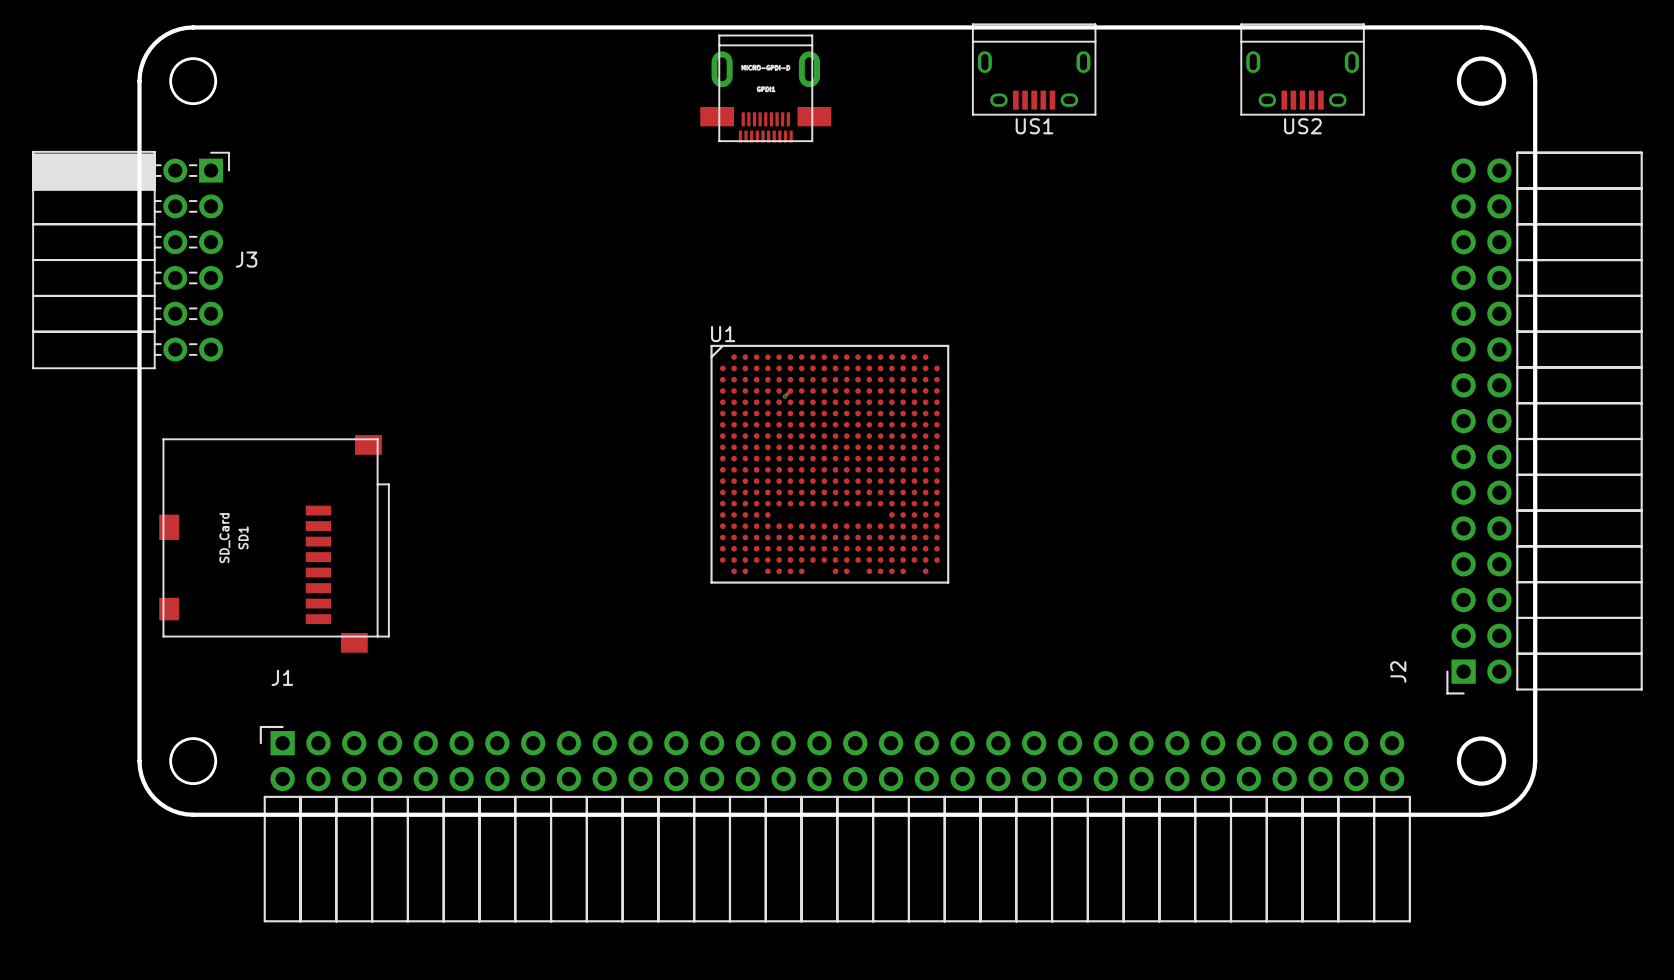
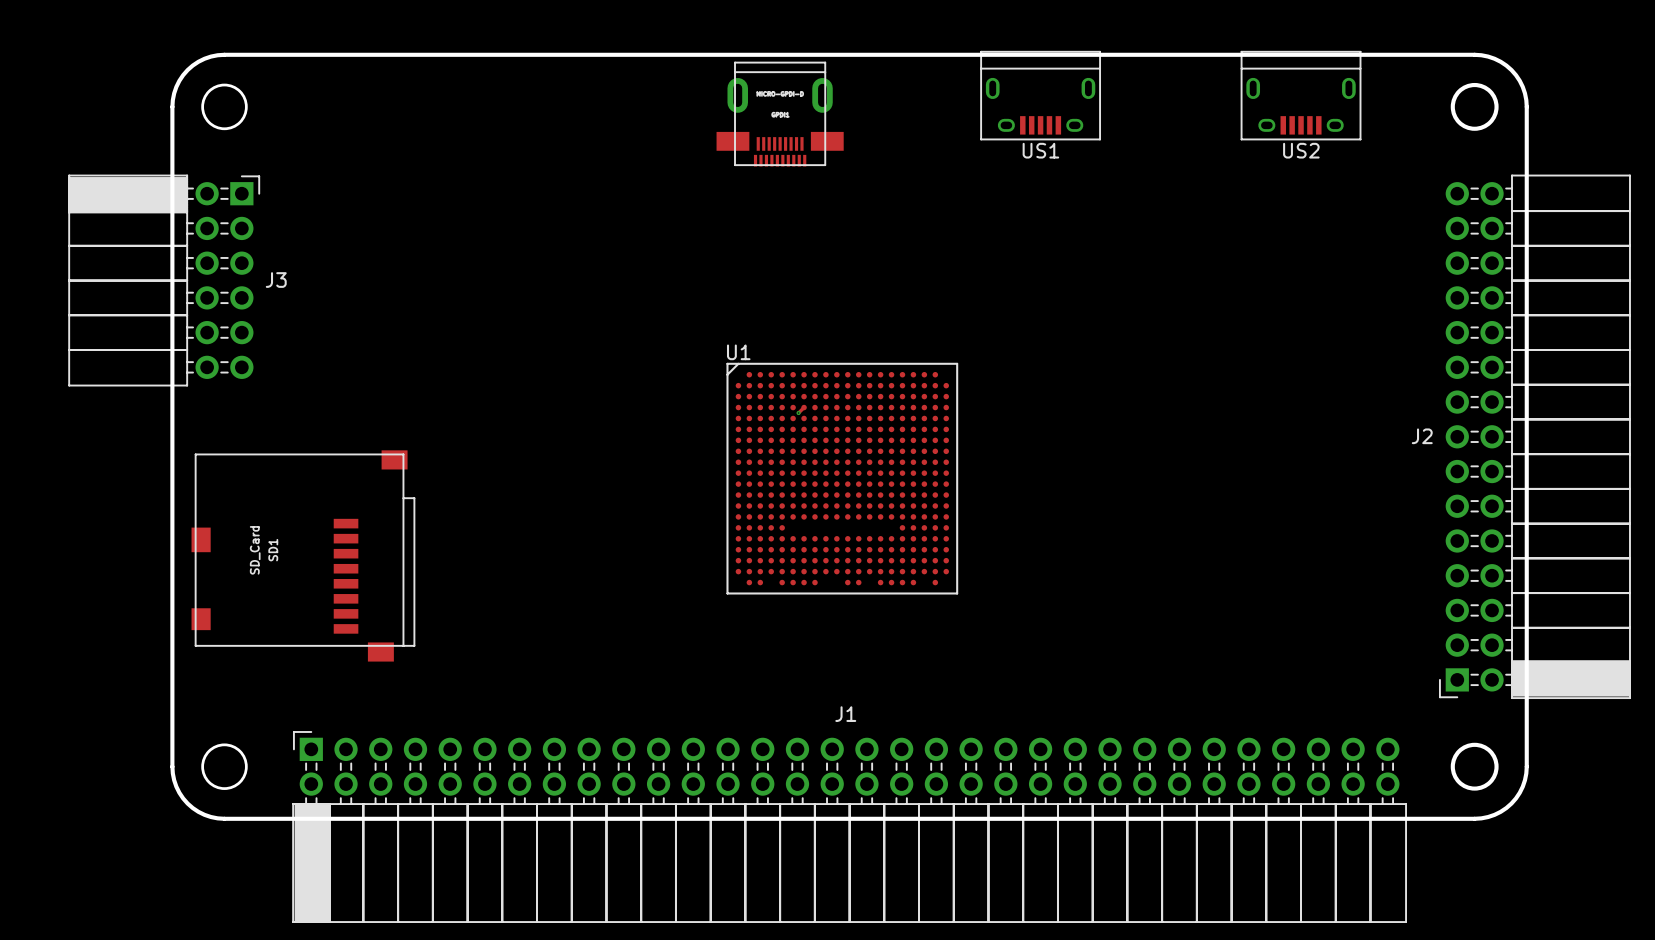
J2 footprint: [1446, 151, 1643, 695] -> [1439, 174, 1631, 699]
J2 name position: J2 (1398, 671) -> J2 (1422, 436)
J1 name position: J1 (282, 677) -> J1 (845, 714)
J1 footprint: [259, 725, 1411, 923] -> [292, 731, 1407, 923]

